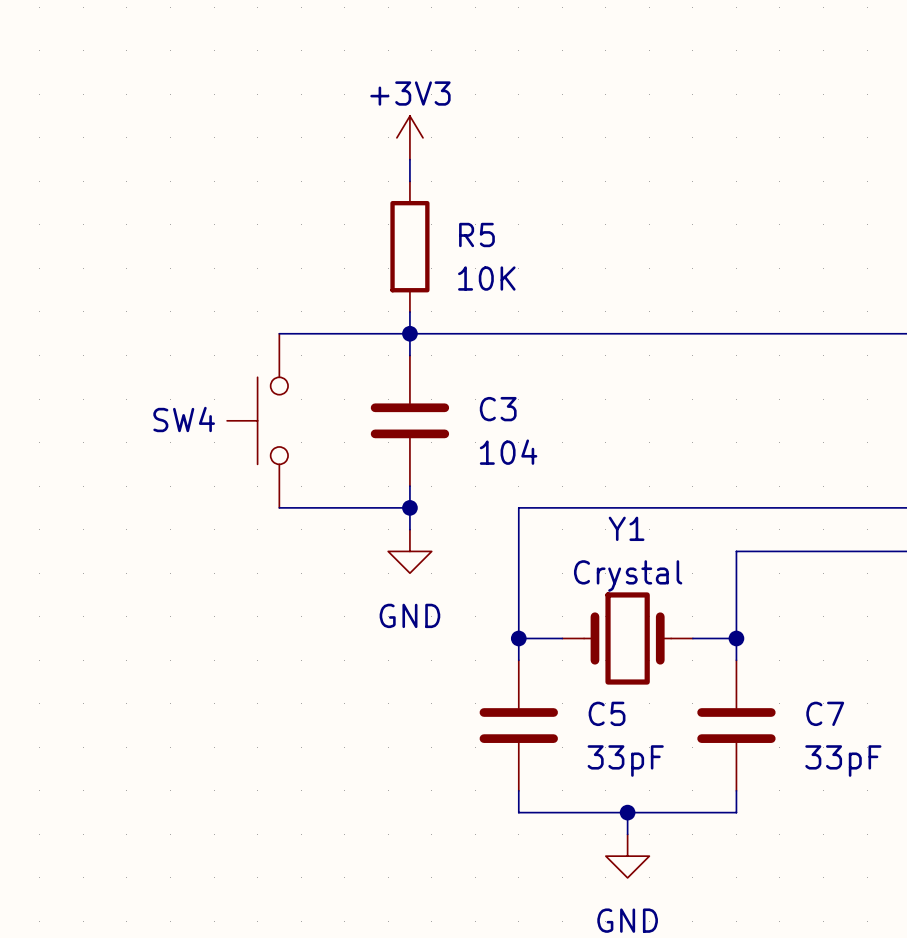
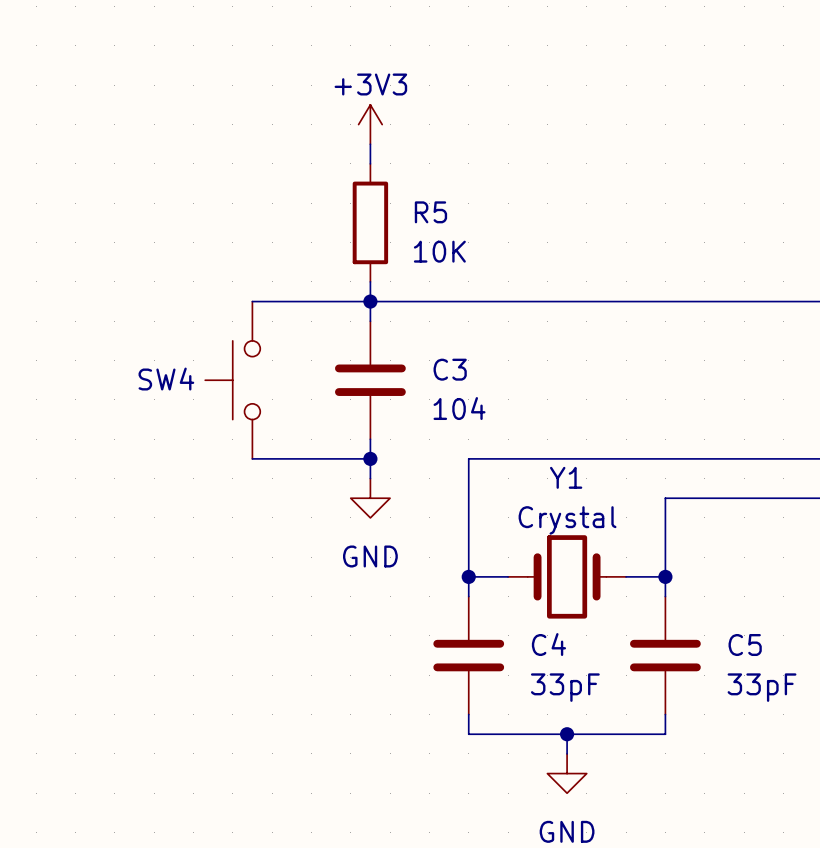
C5 name: C5 (607, 713) -> C4 (548, 644)
C7 name: C7 (825, 713) -> C5 (745, 645)

